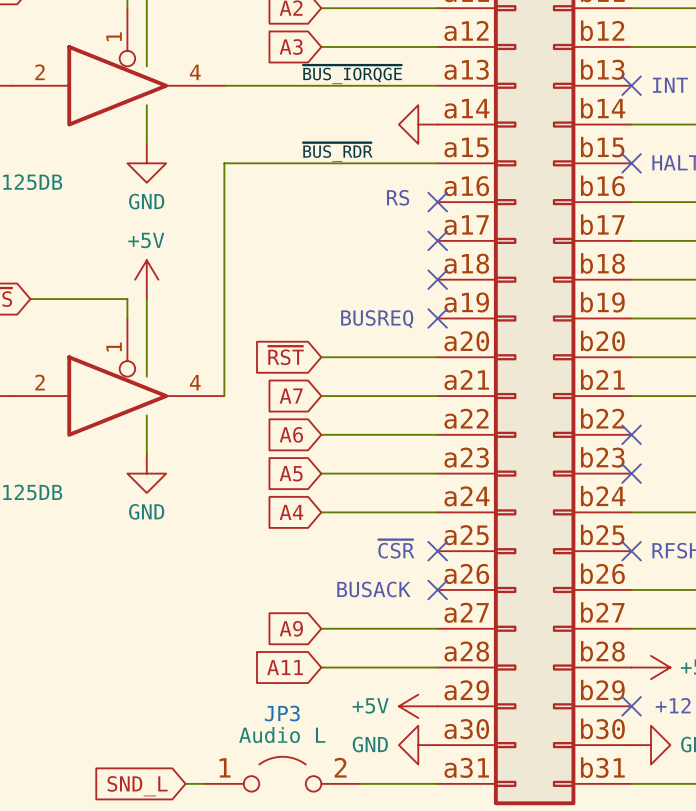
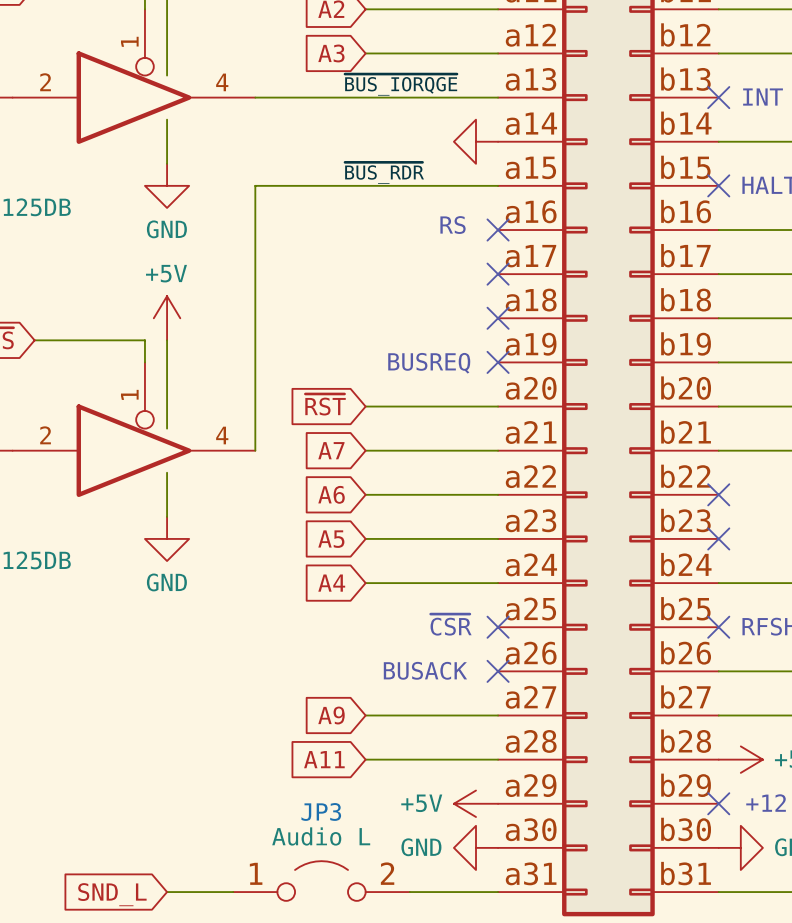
wire: none -> (167, 892) (211, 892)
global label position: SND_L (137, 786) -> SND_L (112, 894)

